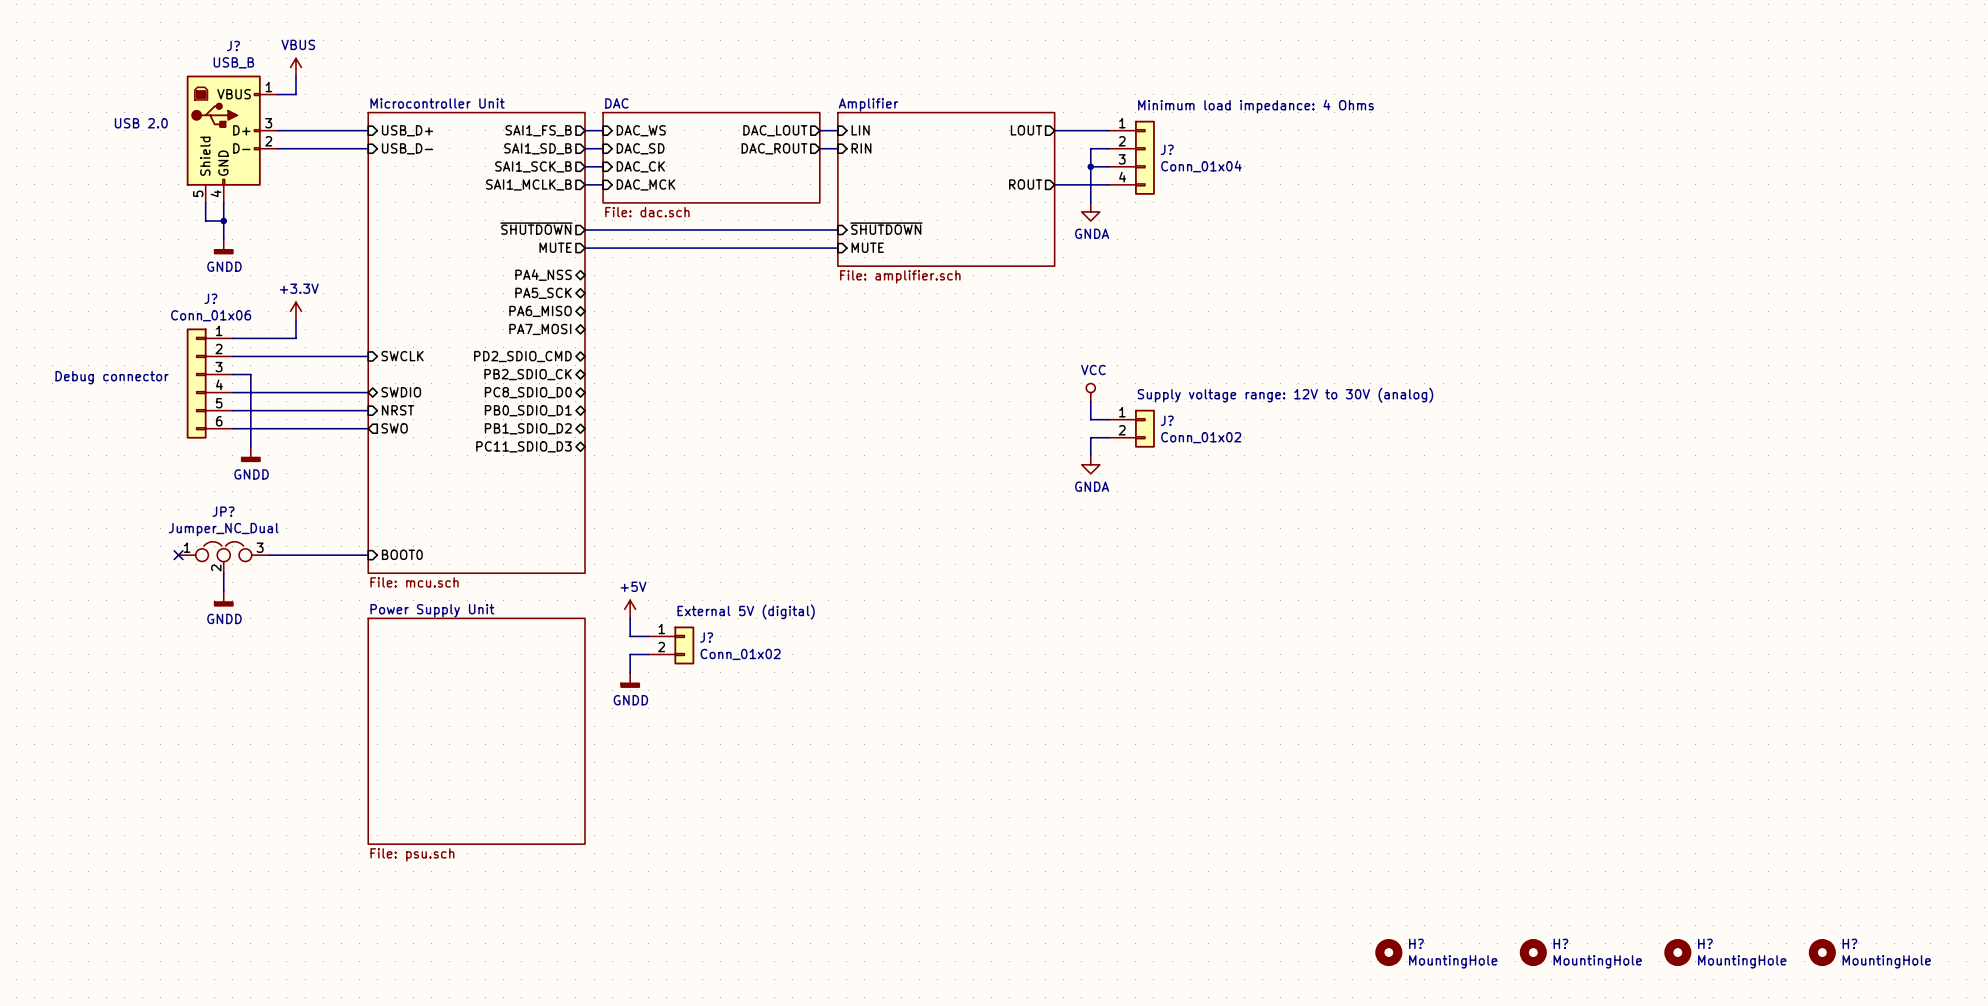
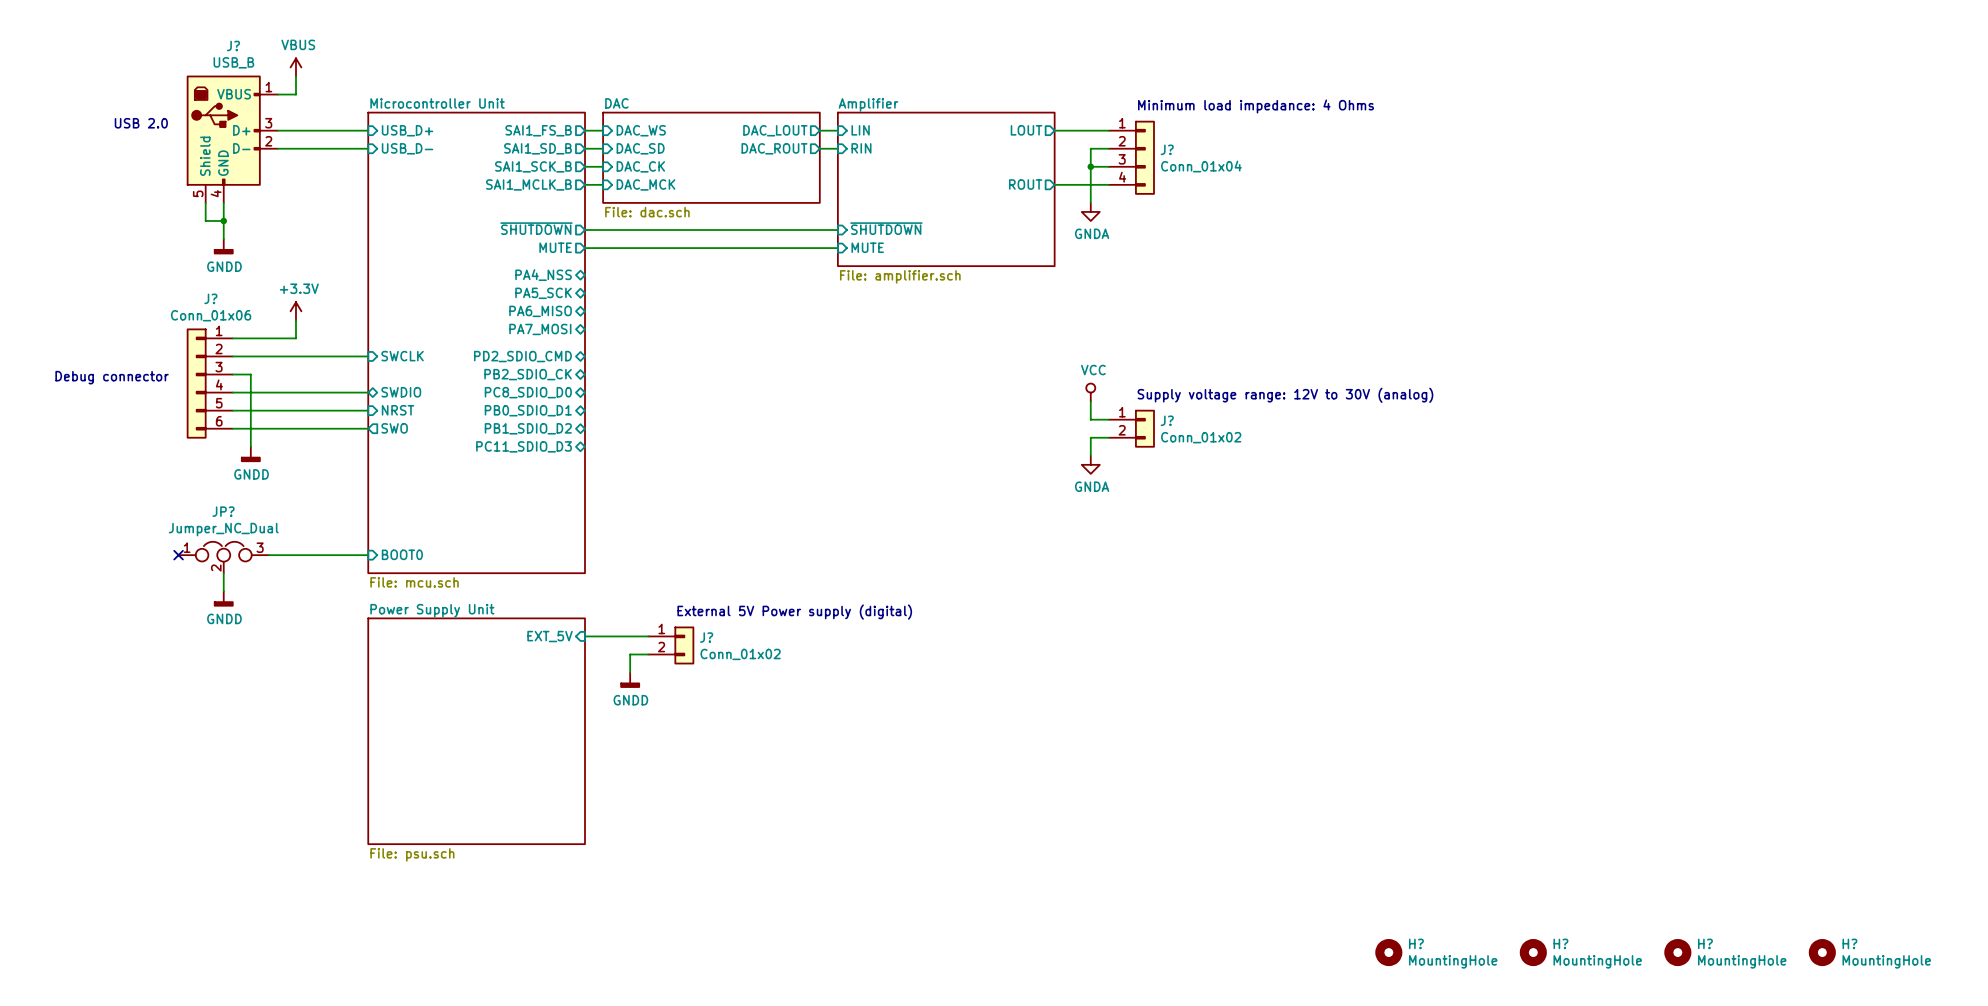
power symbol: +5V (630, 609) -> none
text: External 5V (digital) (746, 612) -> External 5V Power supply (digital) (794, 612)
wire: (630, 618) (630, 636) -> (585, 636) (630, 636)
sheet pin: none -> EXT_5V (550, 636)

